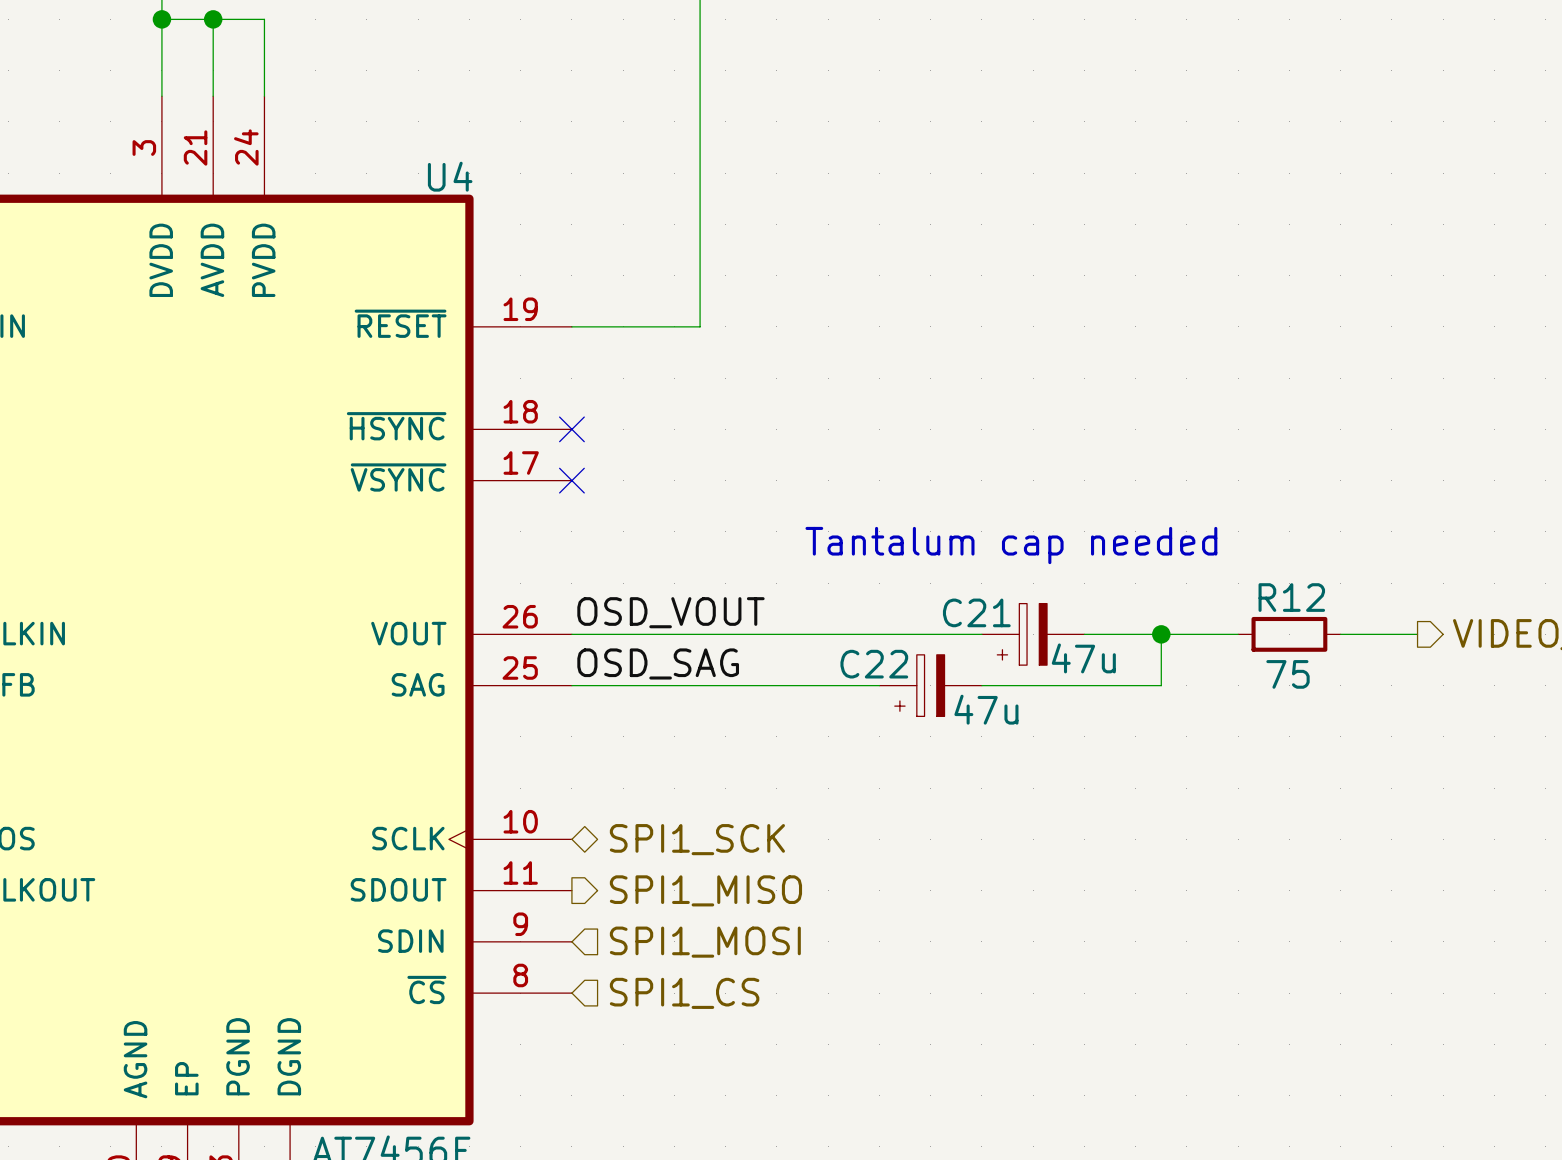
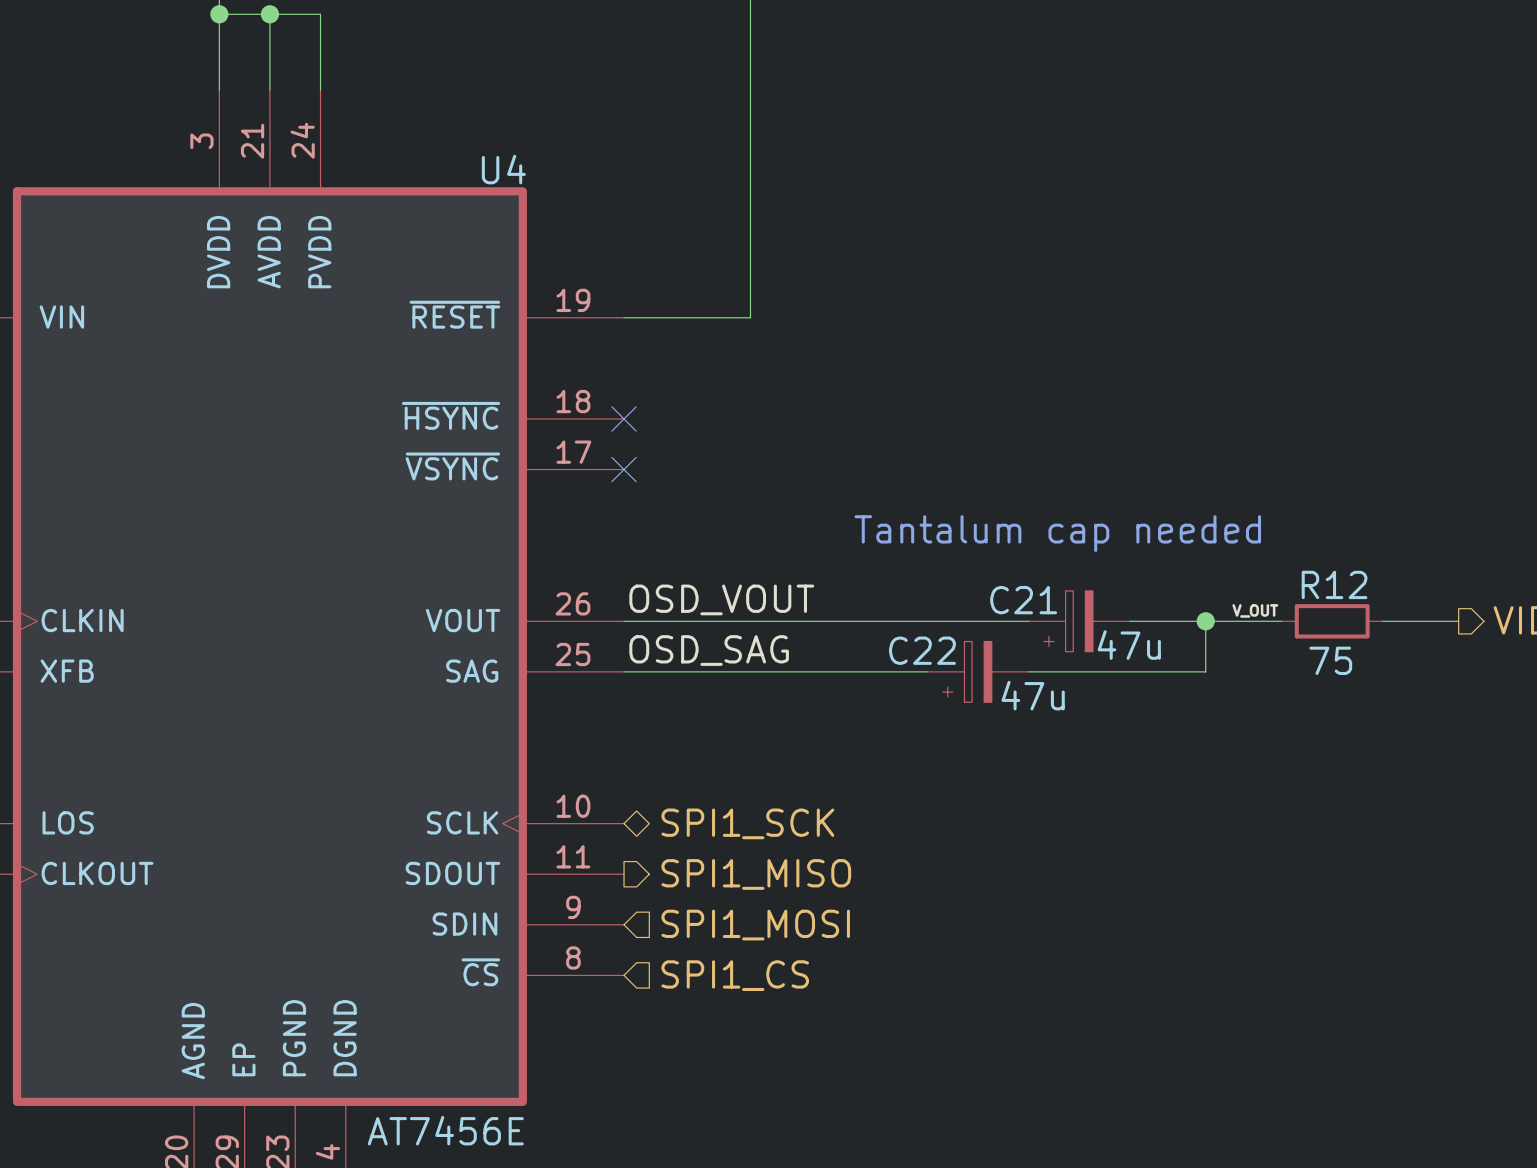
label: none -> V_OUT (1255, 610)

